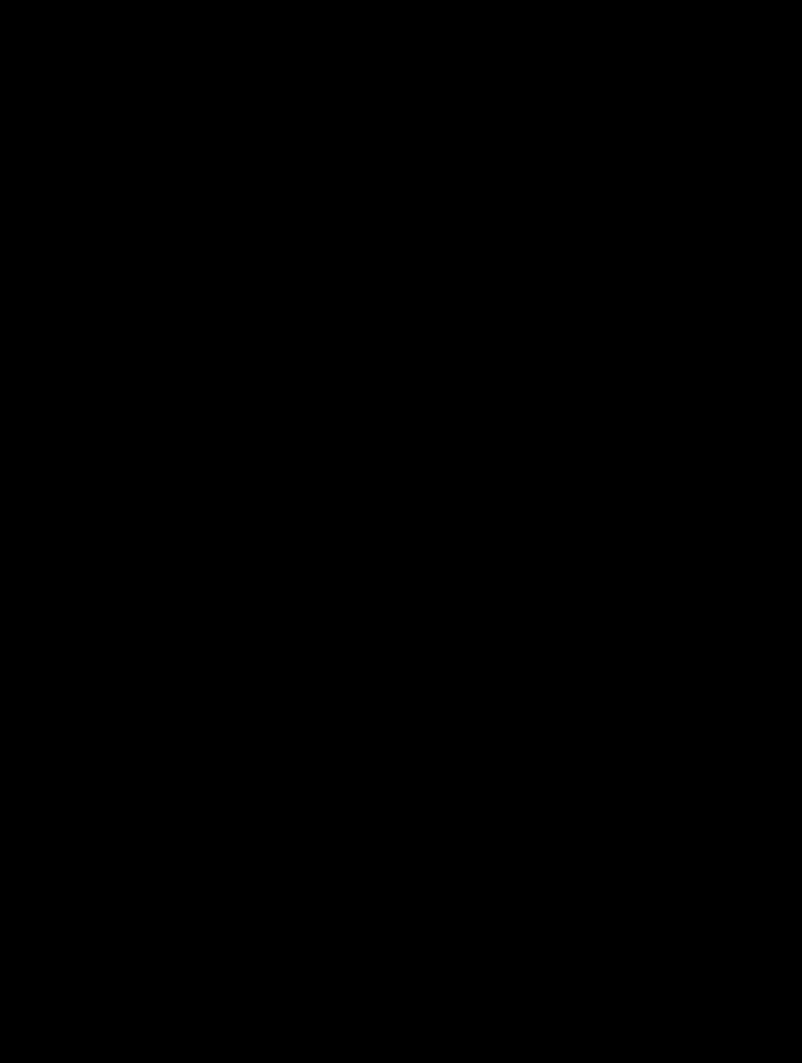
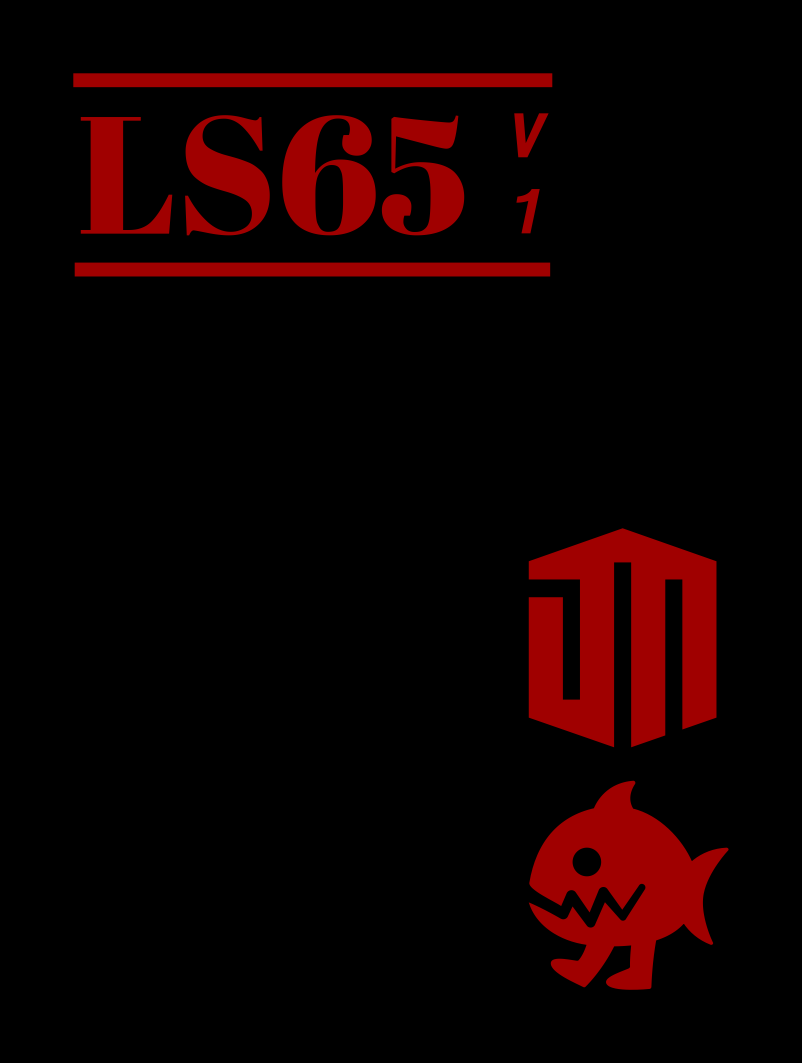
drawing: none -> [73, 73, 553, 277]
drawing: none -> [528, 528, 729, 990]

